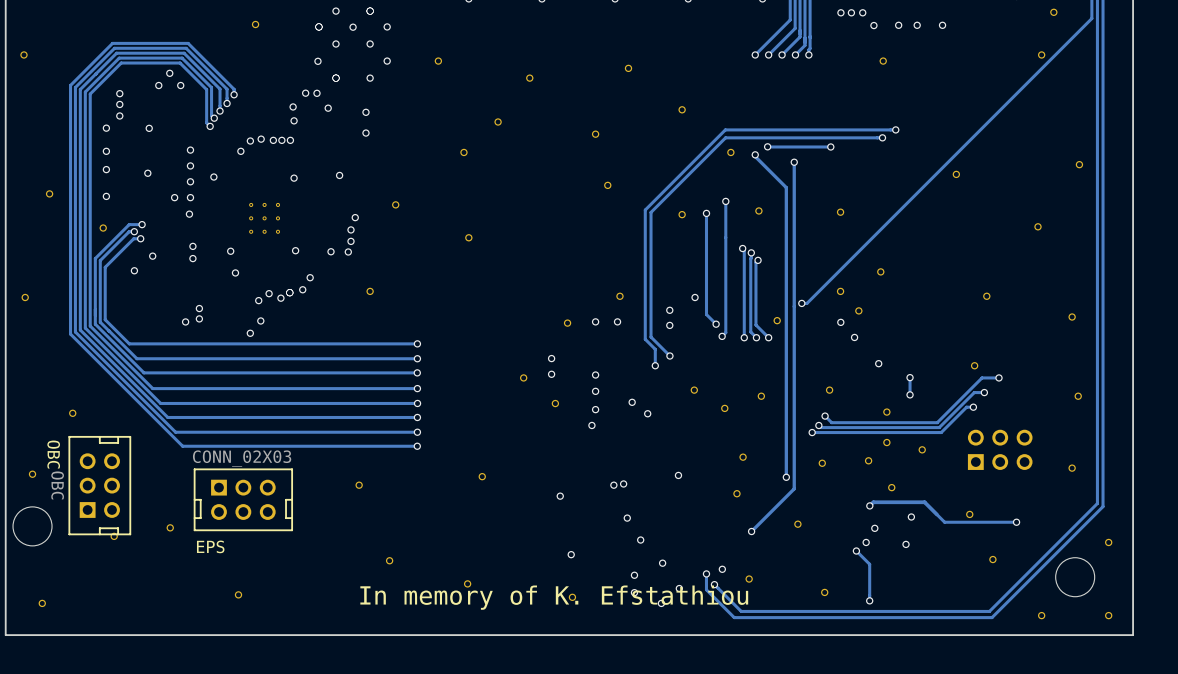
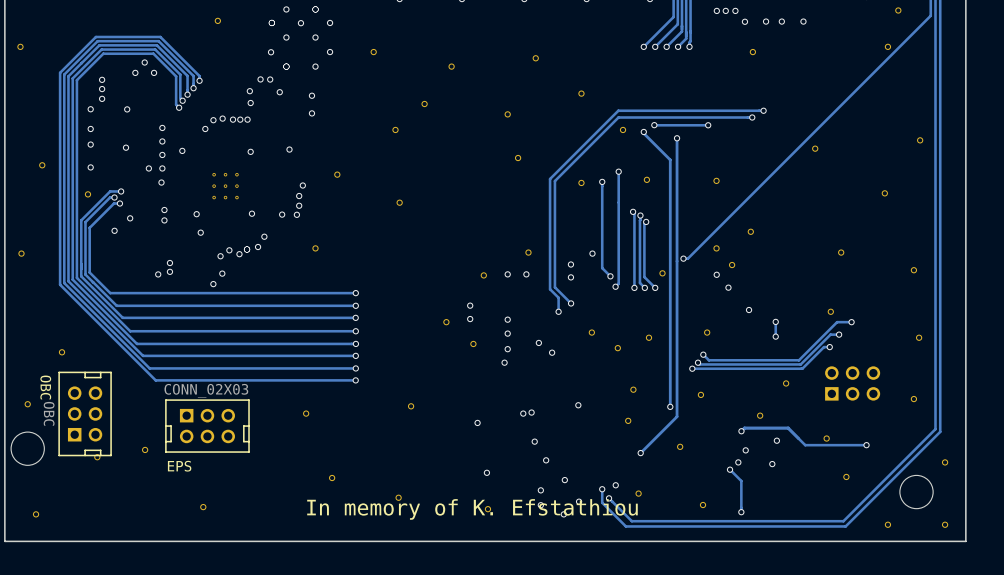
part: (886, 412) -> none
part: (886, 442) -> none
part: (868, 460) -> none

